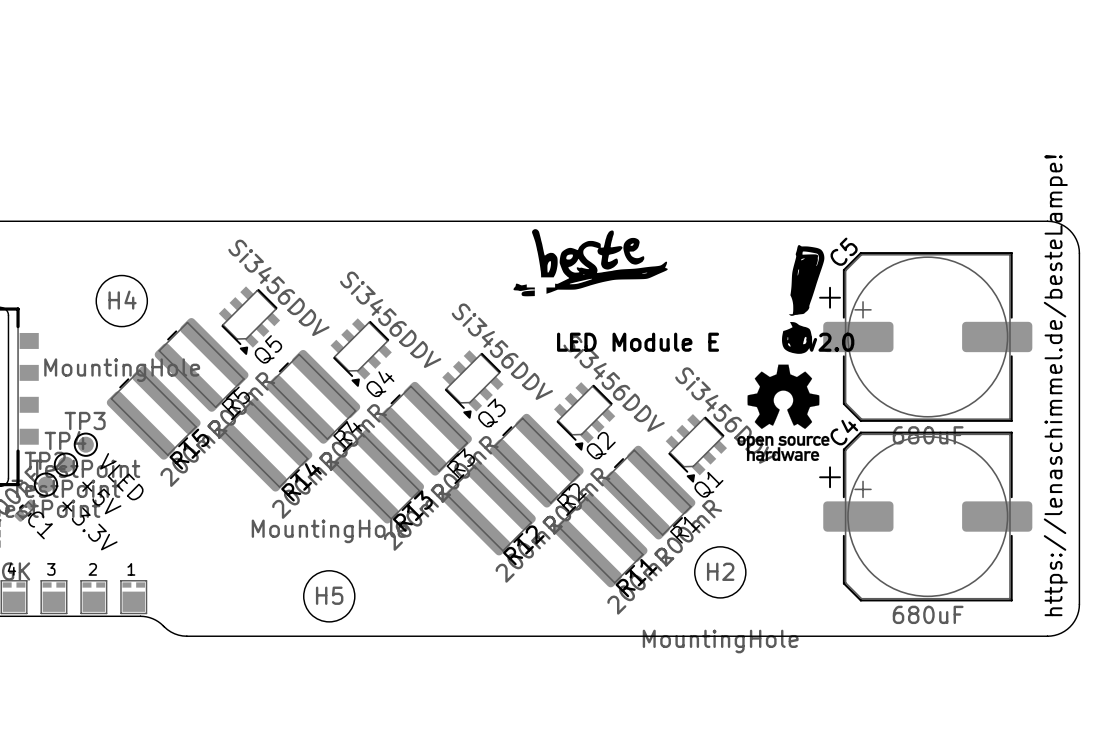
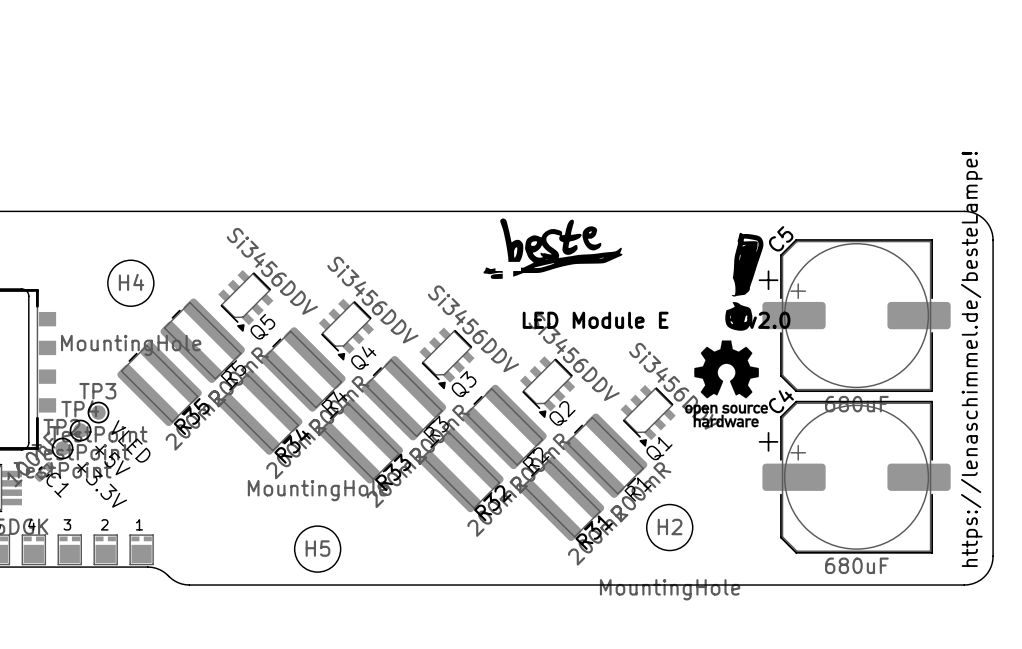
R15 name: R15 (189, 449) -> R35 (191, 416)
R14 name: R14 (301, 482) -> R34 (292, 446)
R13 name: R13 (412, 511) -> R33 (392, 472)
R12 name: R12 (523, 545) -> R32 (492, 503)
R11 name: R11 (636, 578) -> R31 (594, 532)

